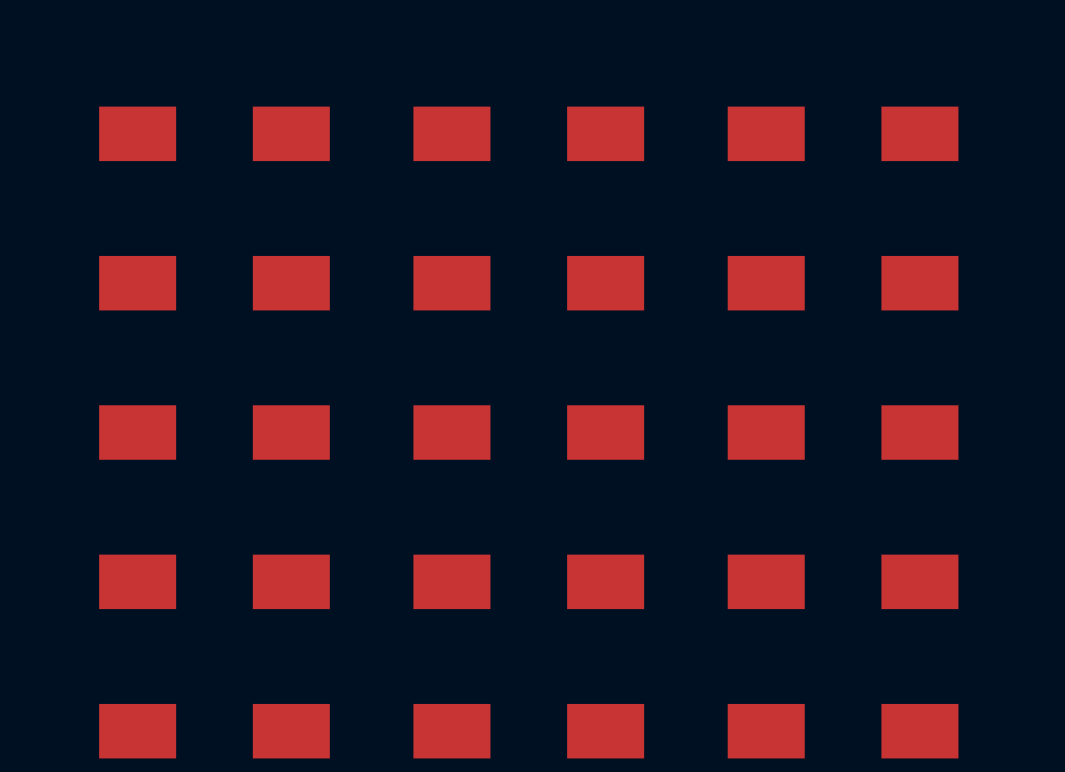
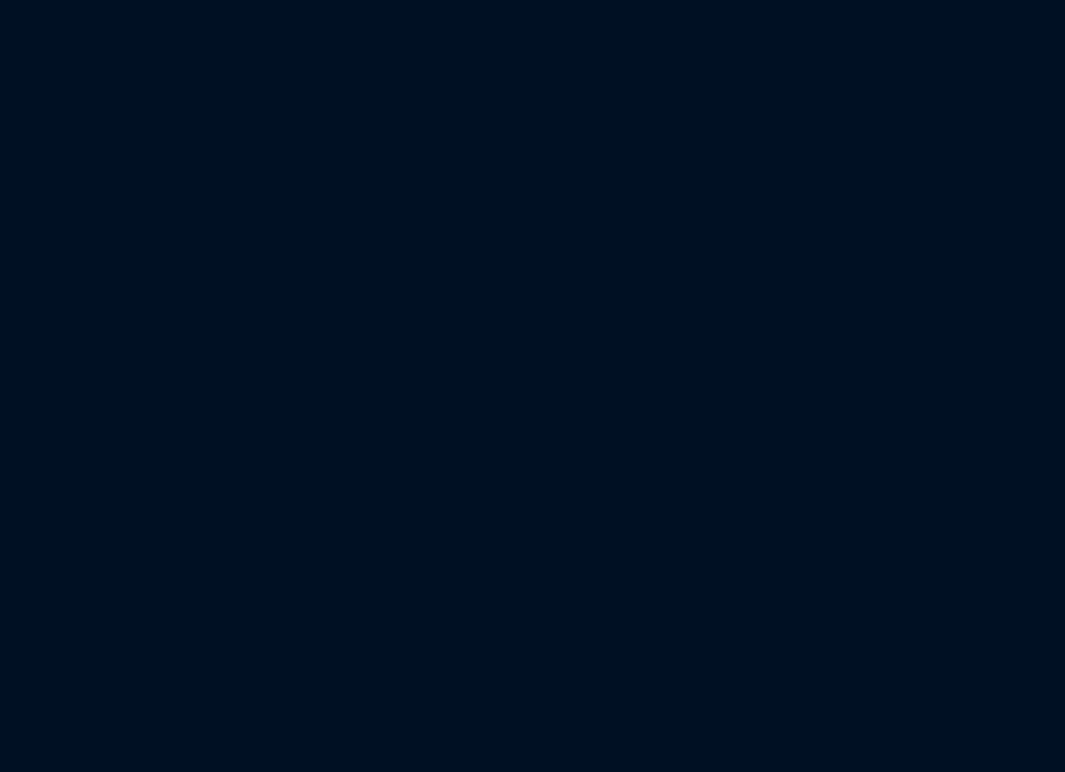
part: (214, 133) -> none
part: (528, 133) -> none
part: (843, 133) -> none
part: (214, 283) -> none
part: (528, 283) -> none
part: (843, 283) -> none
part: (214, 432) -> none
part: (528, 432) -> none
part: (843, 432) -> none
part: (214, 581) -> none
part: (528, 581) -> none
part: (843, 581) -> none
part: (214, 731) -> none
part: (528, 731) -> none
part: (843, 731) -> none

